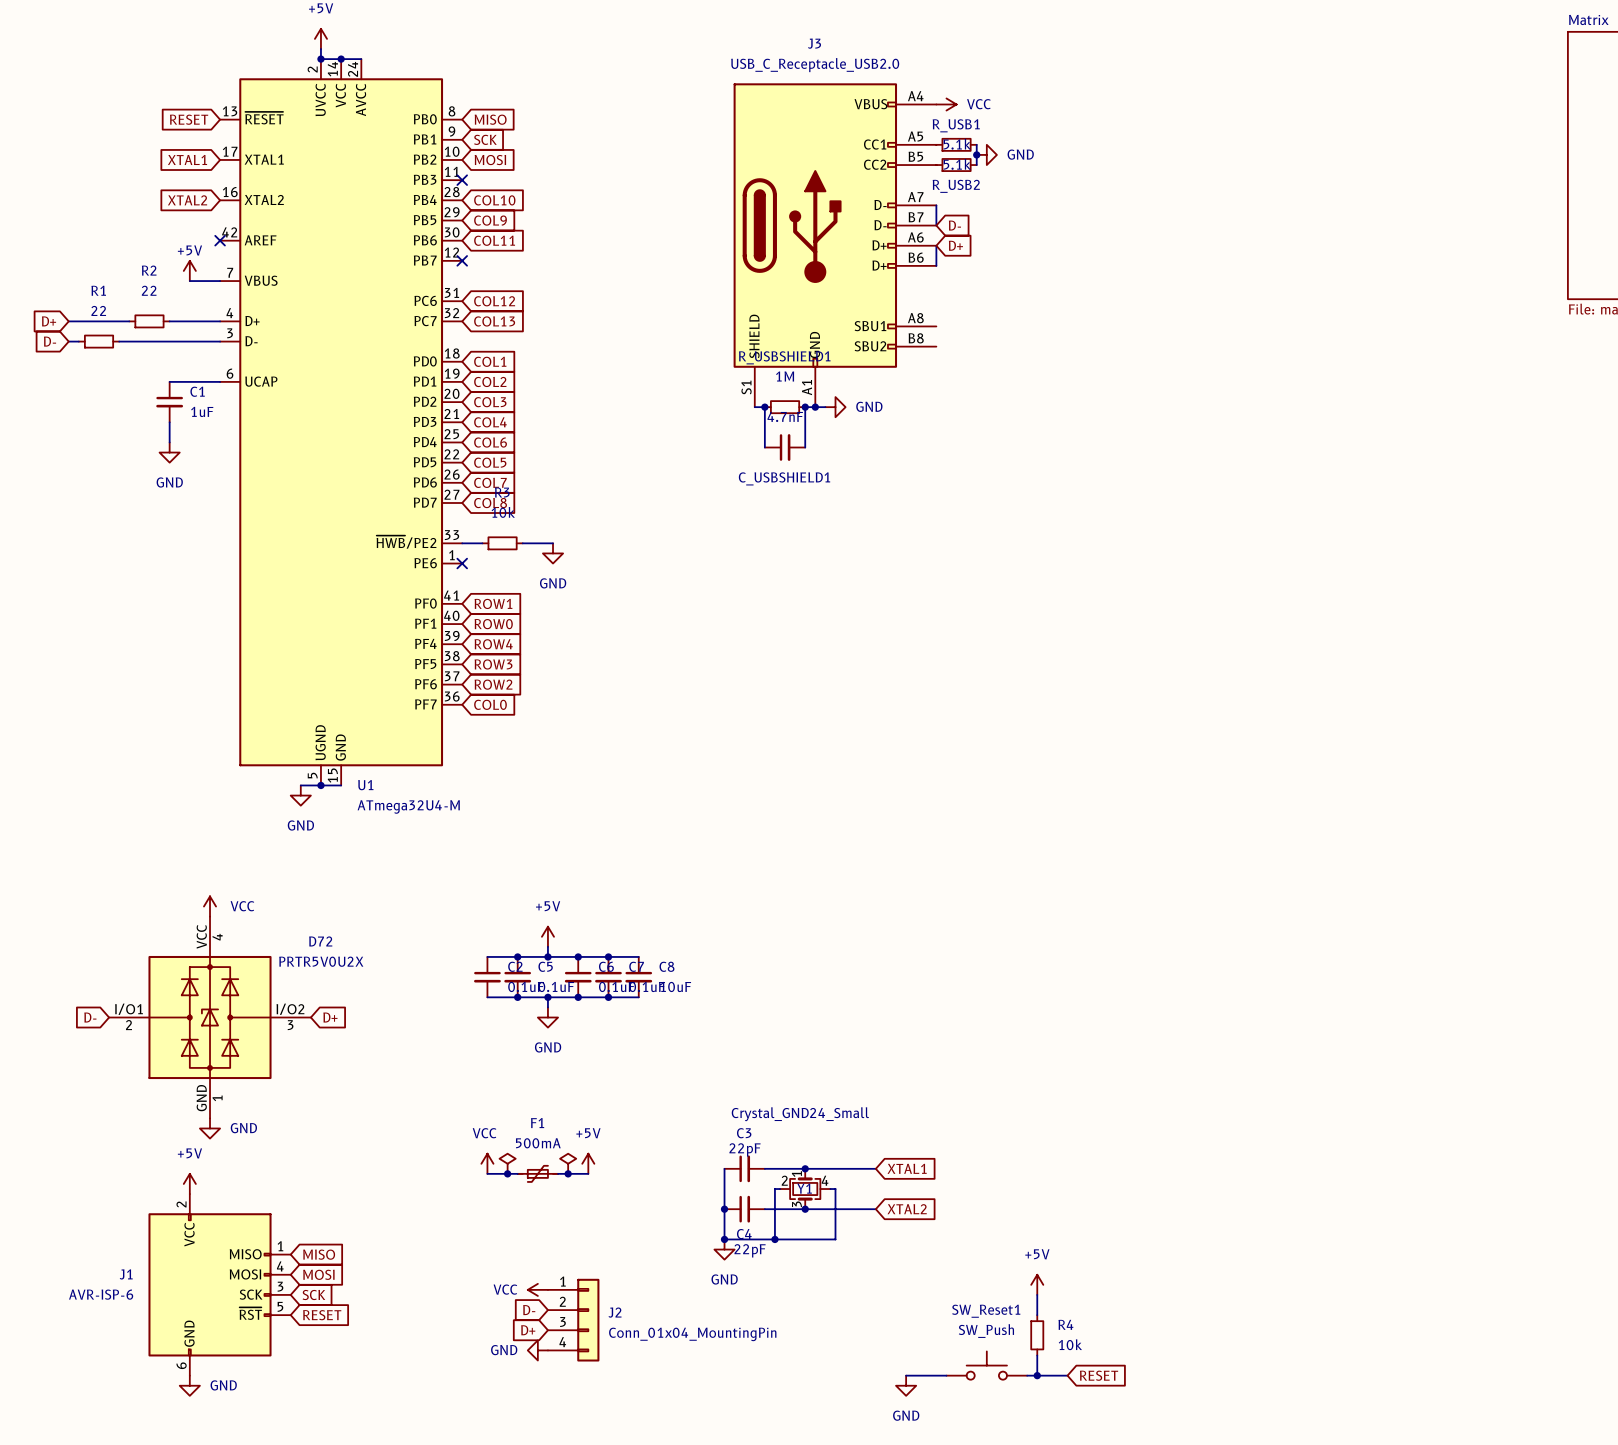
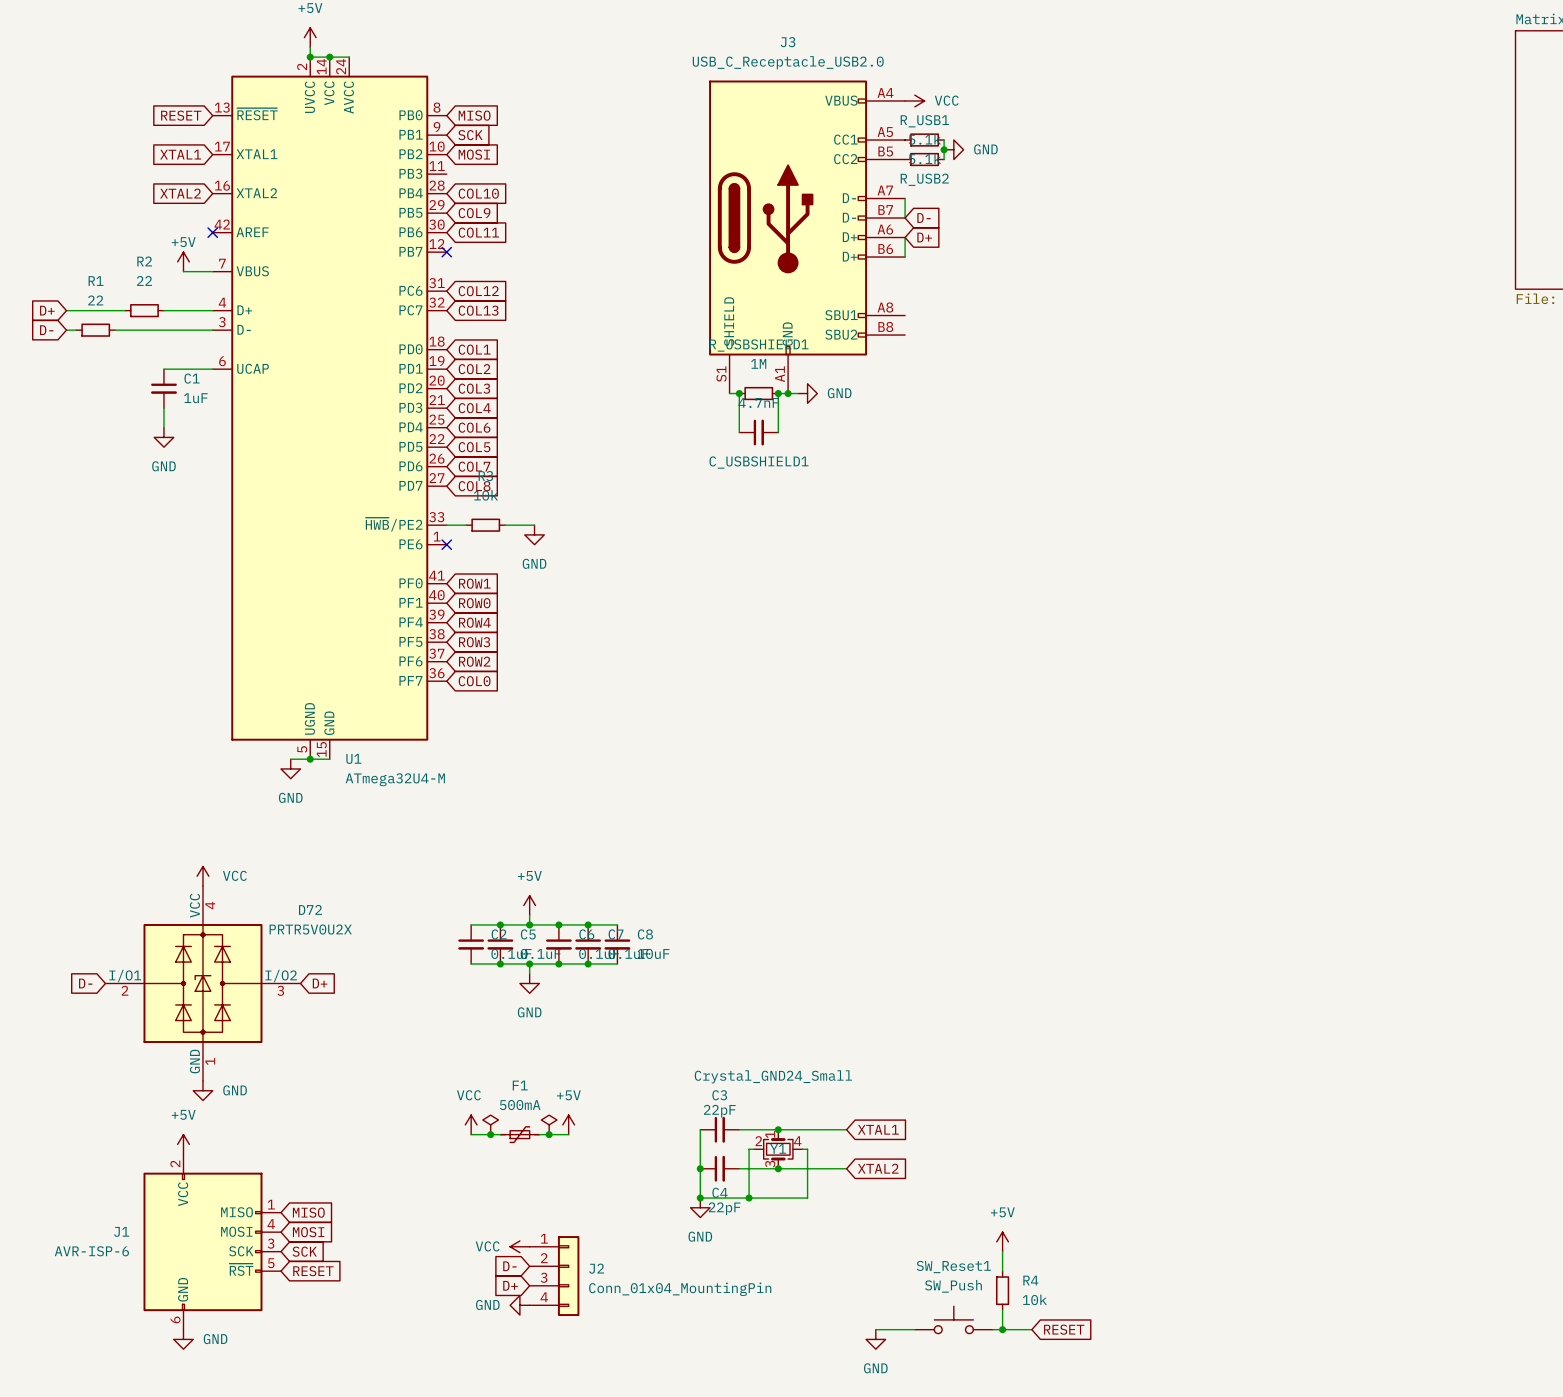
no-connect mark: (462, 180) -> none

